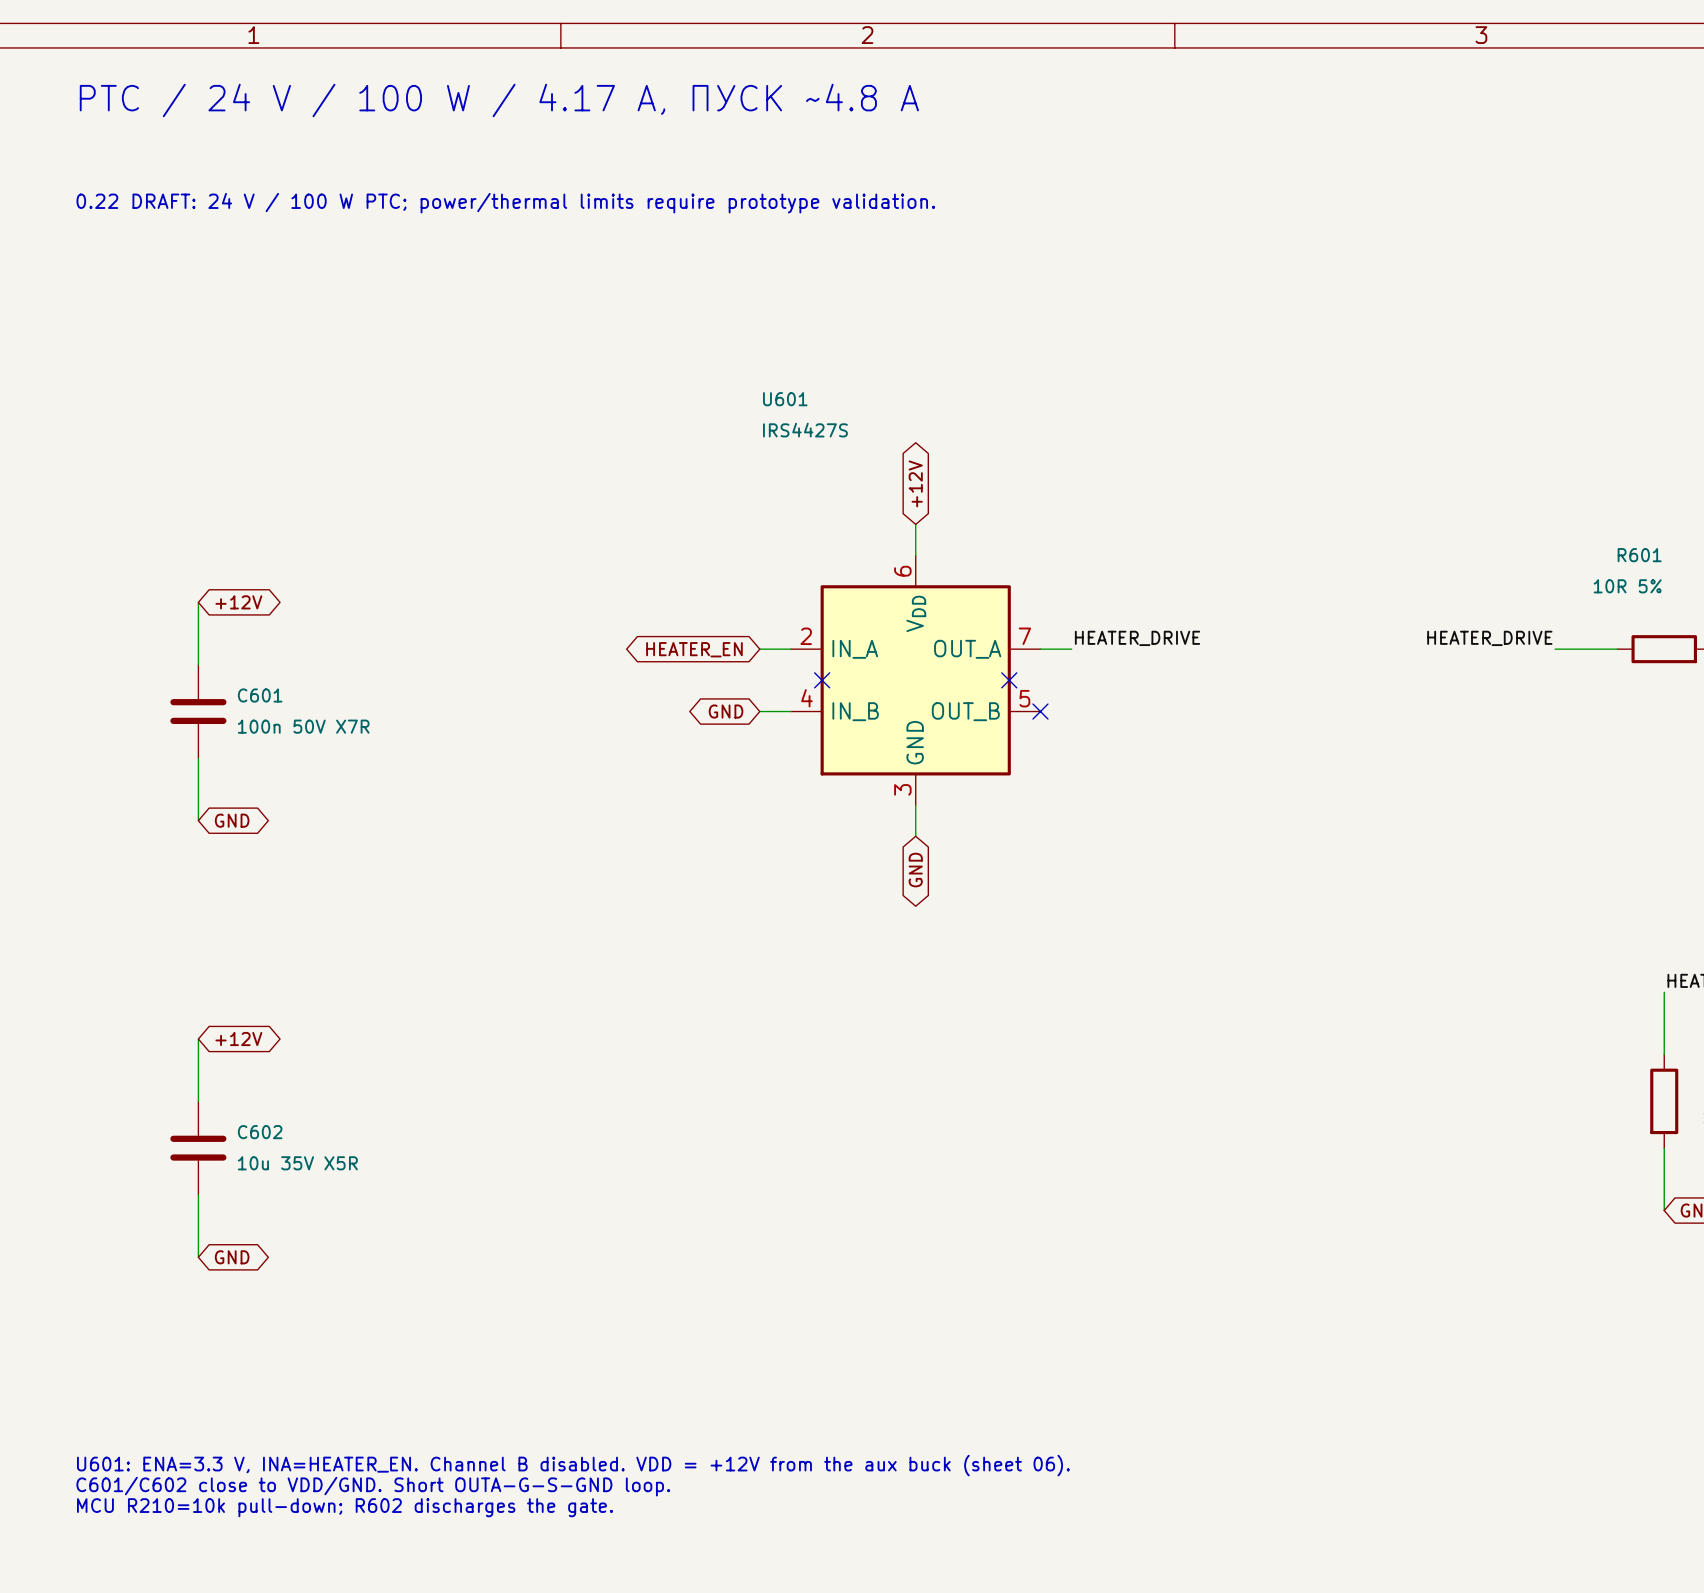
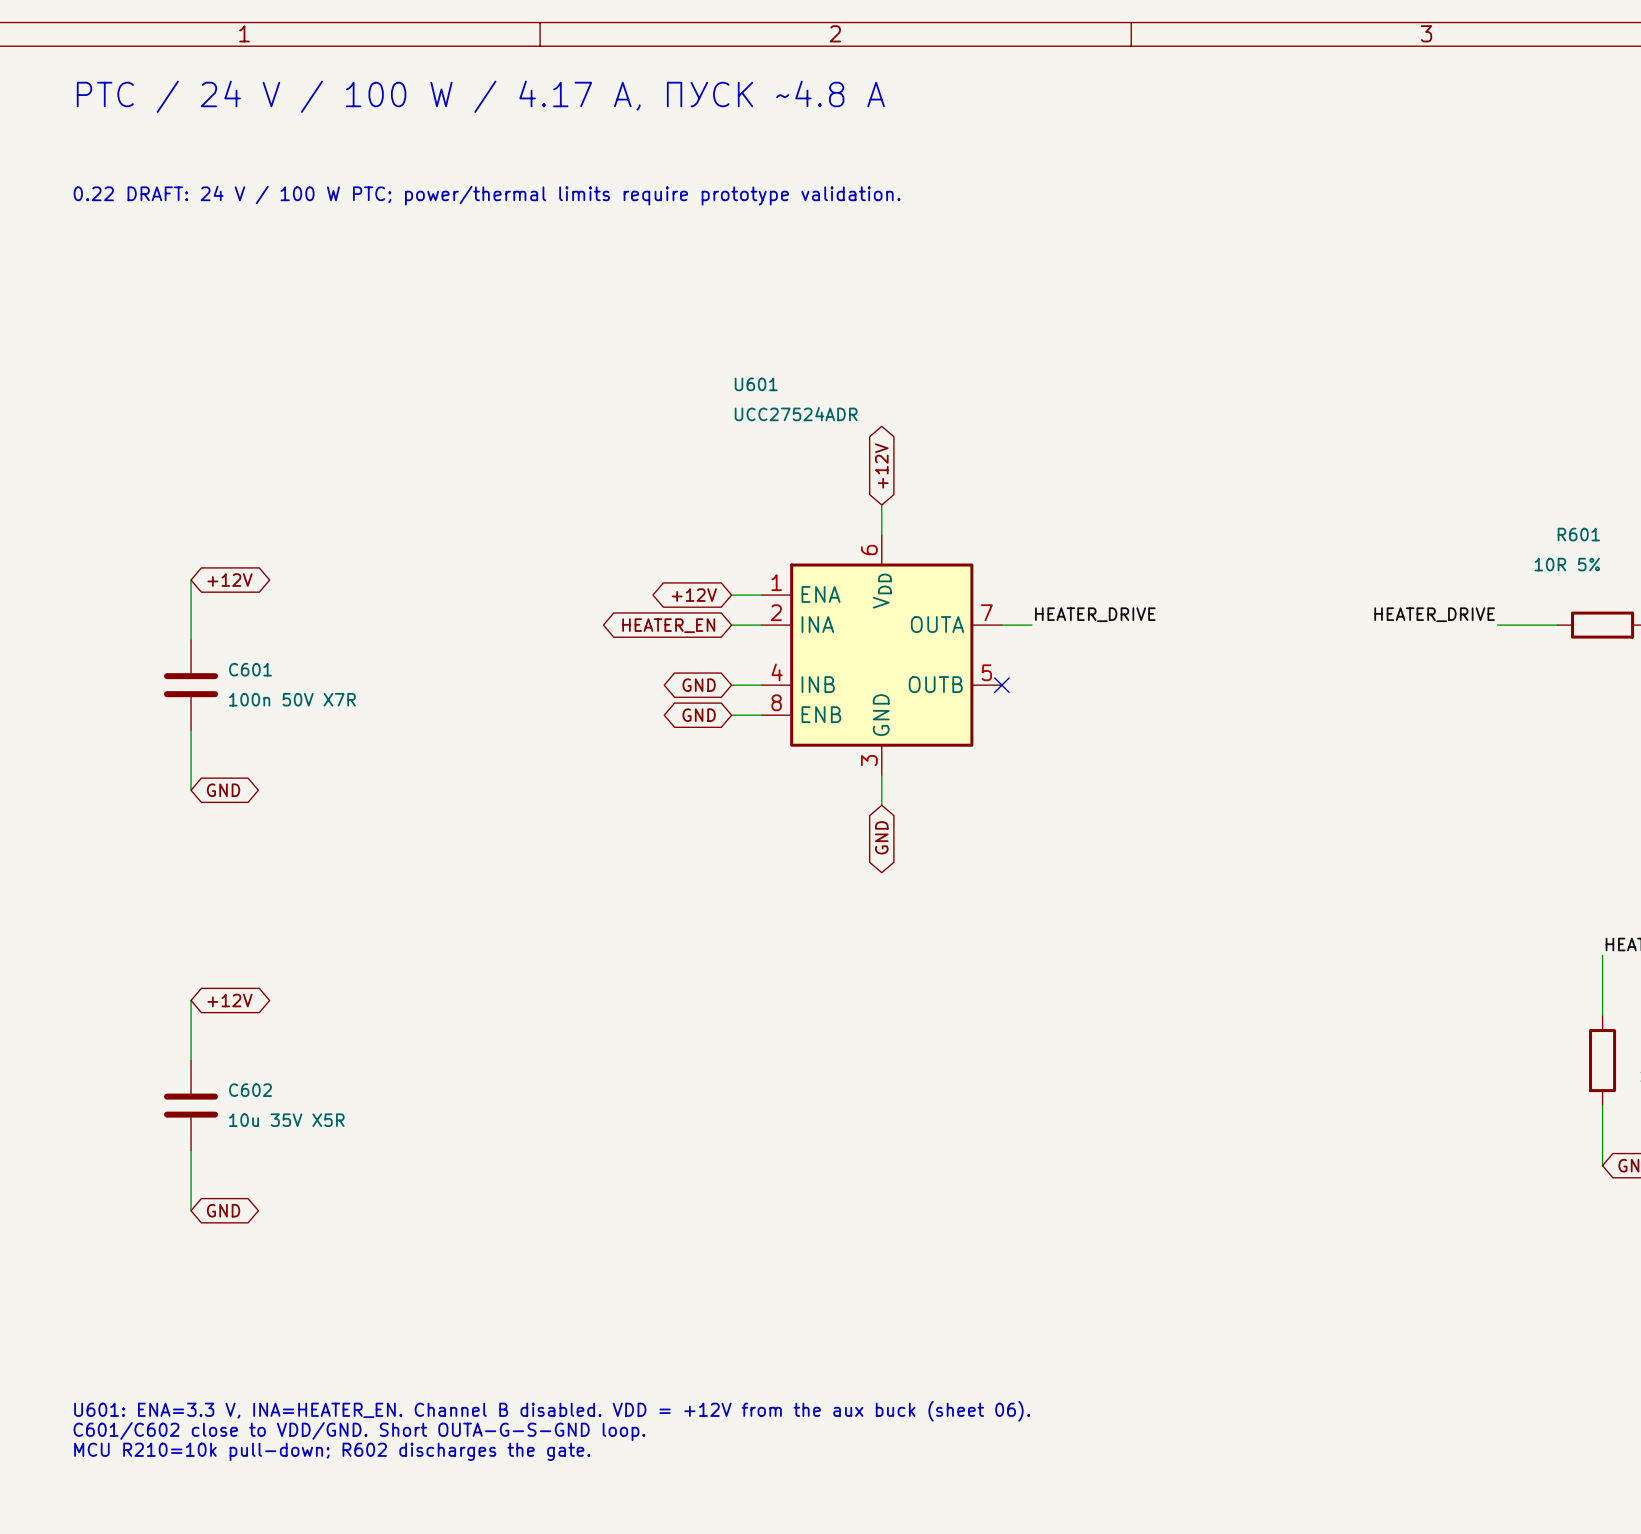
U601 value: IRS4427S (805, 430) -> UCC27524ADR (796, 414)
U601 symbol: [790, 555, 1041, 806] -> [761, 534, 1002, 776]
global label: none -> +12V (694, 595)
wire: none -> (731, 595) (761, 595)
no-connect mark: (822, 680) -> none
no-connect mark: (1009, 680) -> none
global label: none -> GND (699, 715)
wire: none -> (731, 715) (761, 715)

